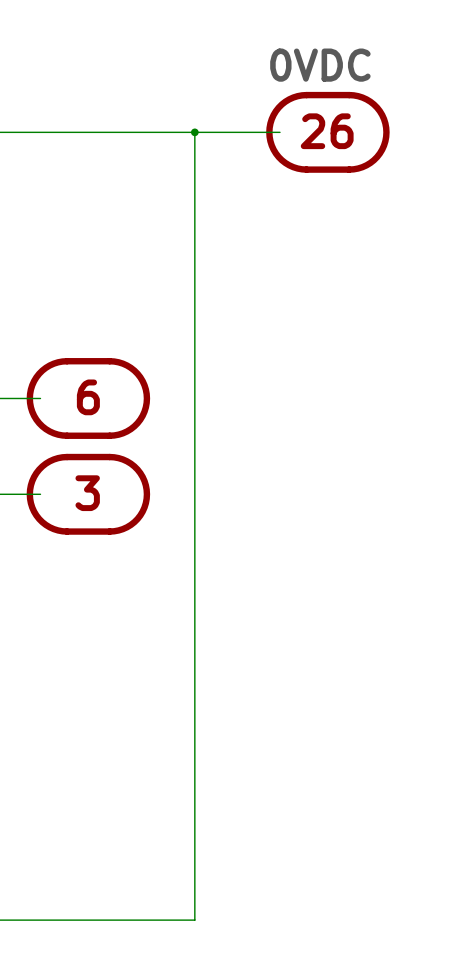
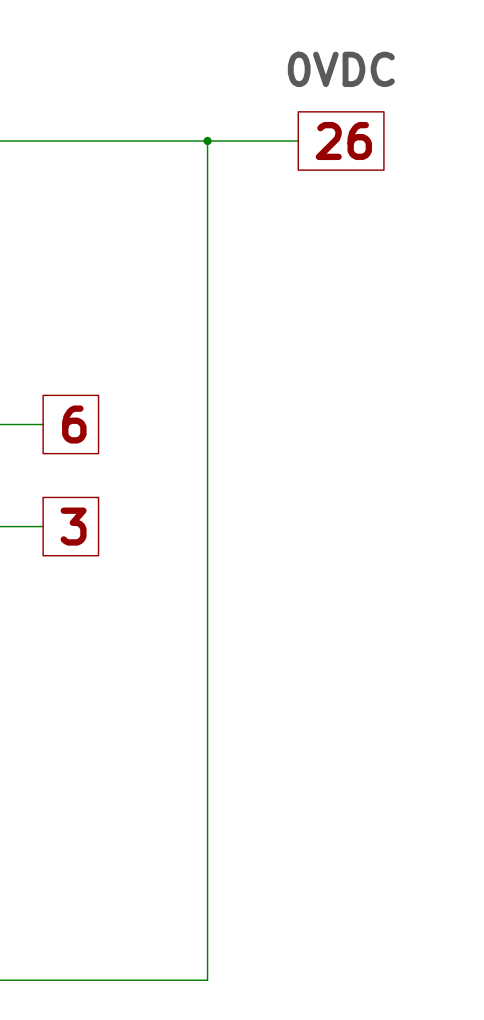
global label: none -> 26 (343, 140)
part: (327, 132) -> none
global label: none -> 6 (74, 424)
part: (88, 398) -> none
global label: none -> 3 (73, 526)
part: (88, 494) -> none

